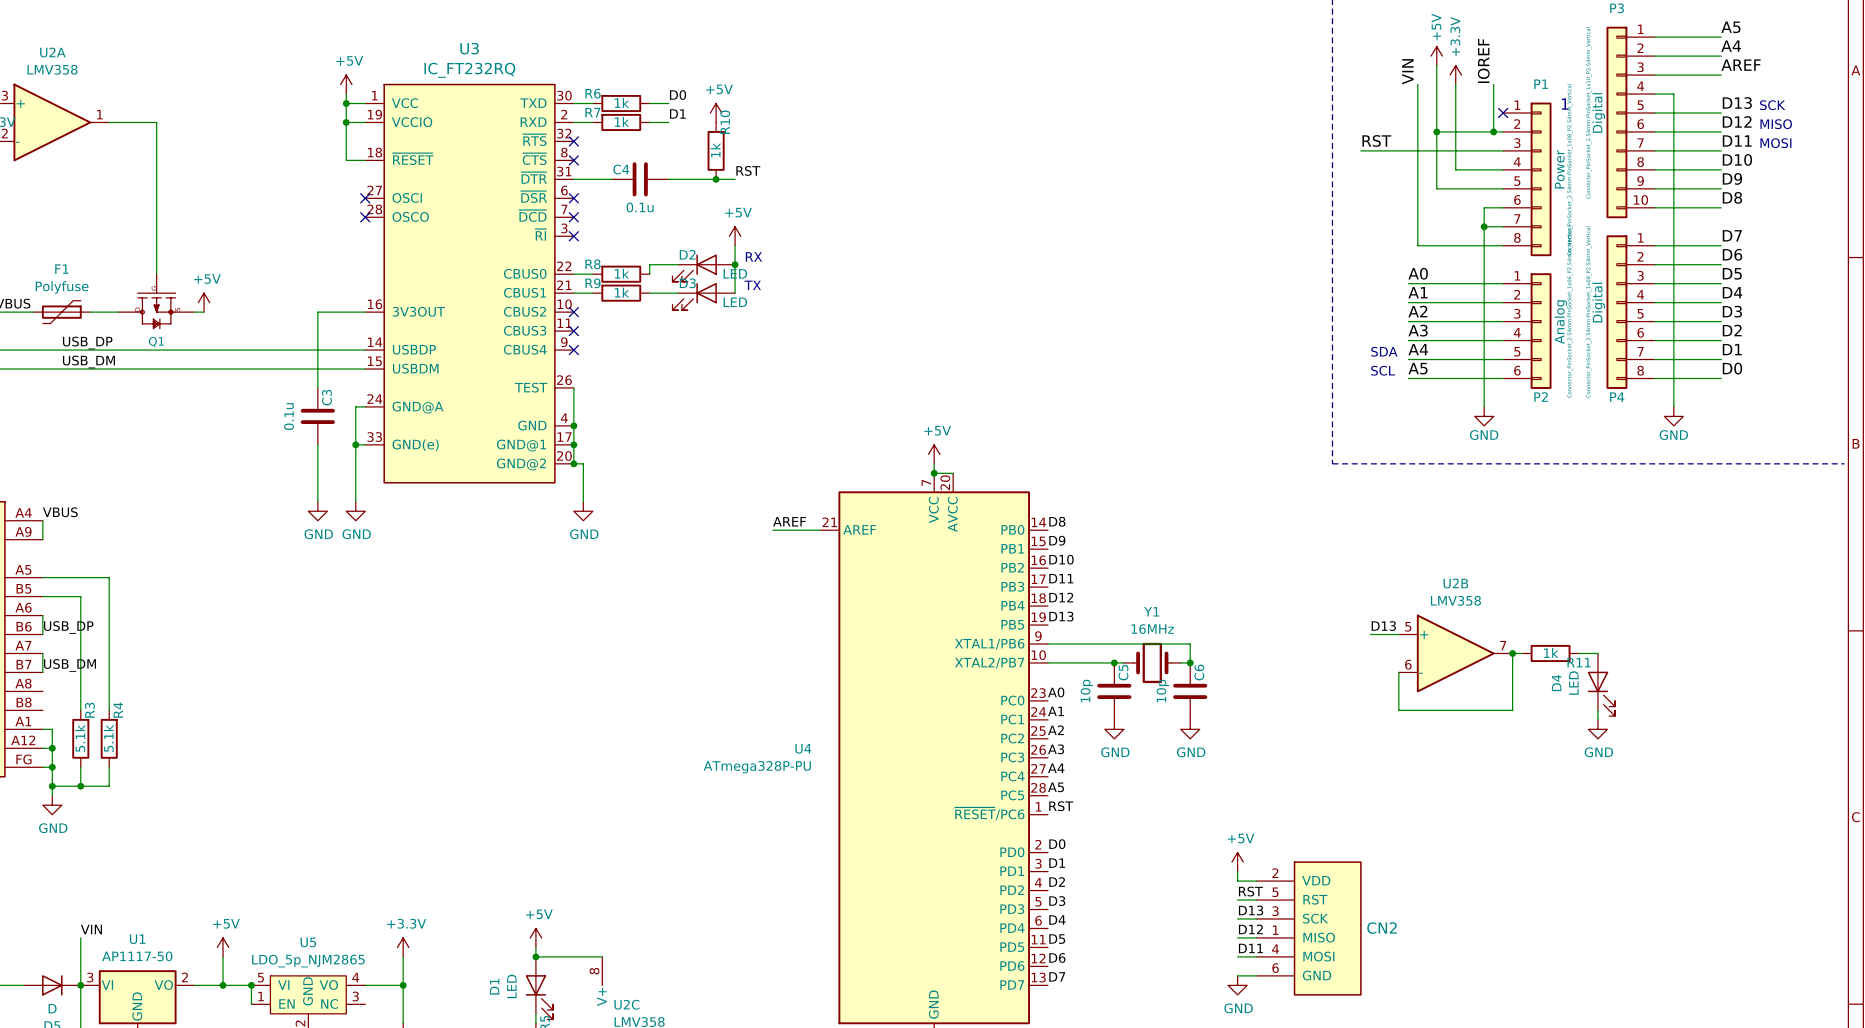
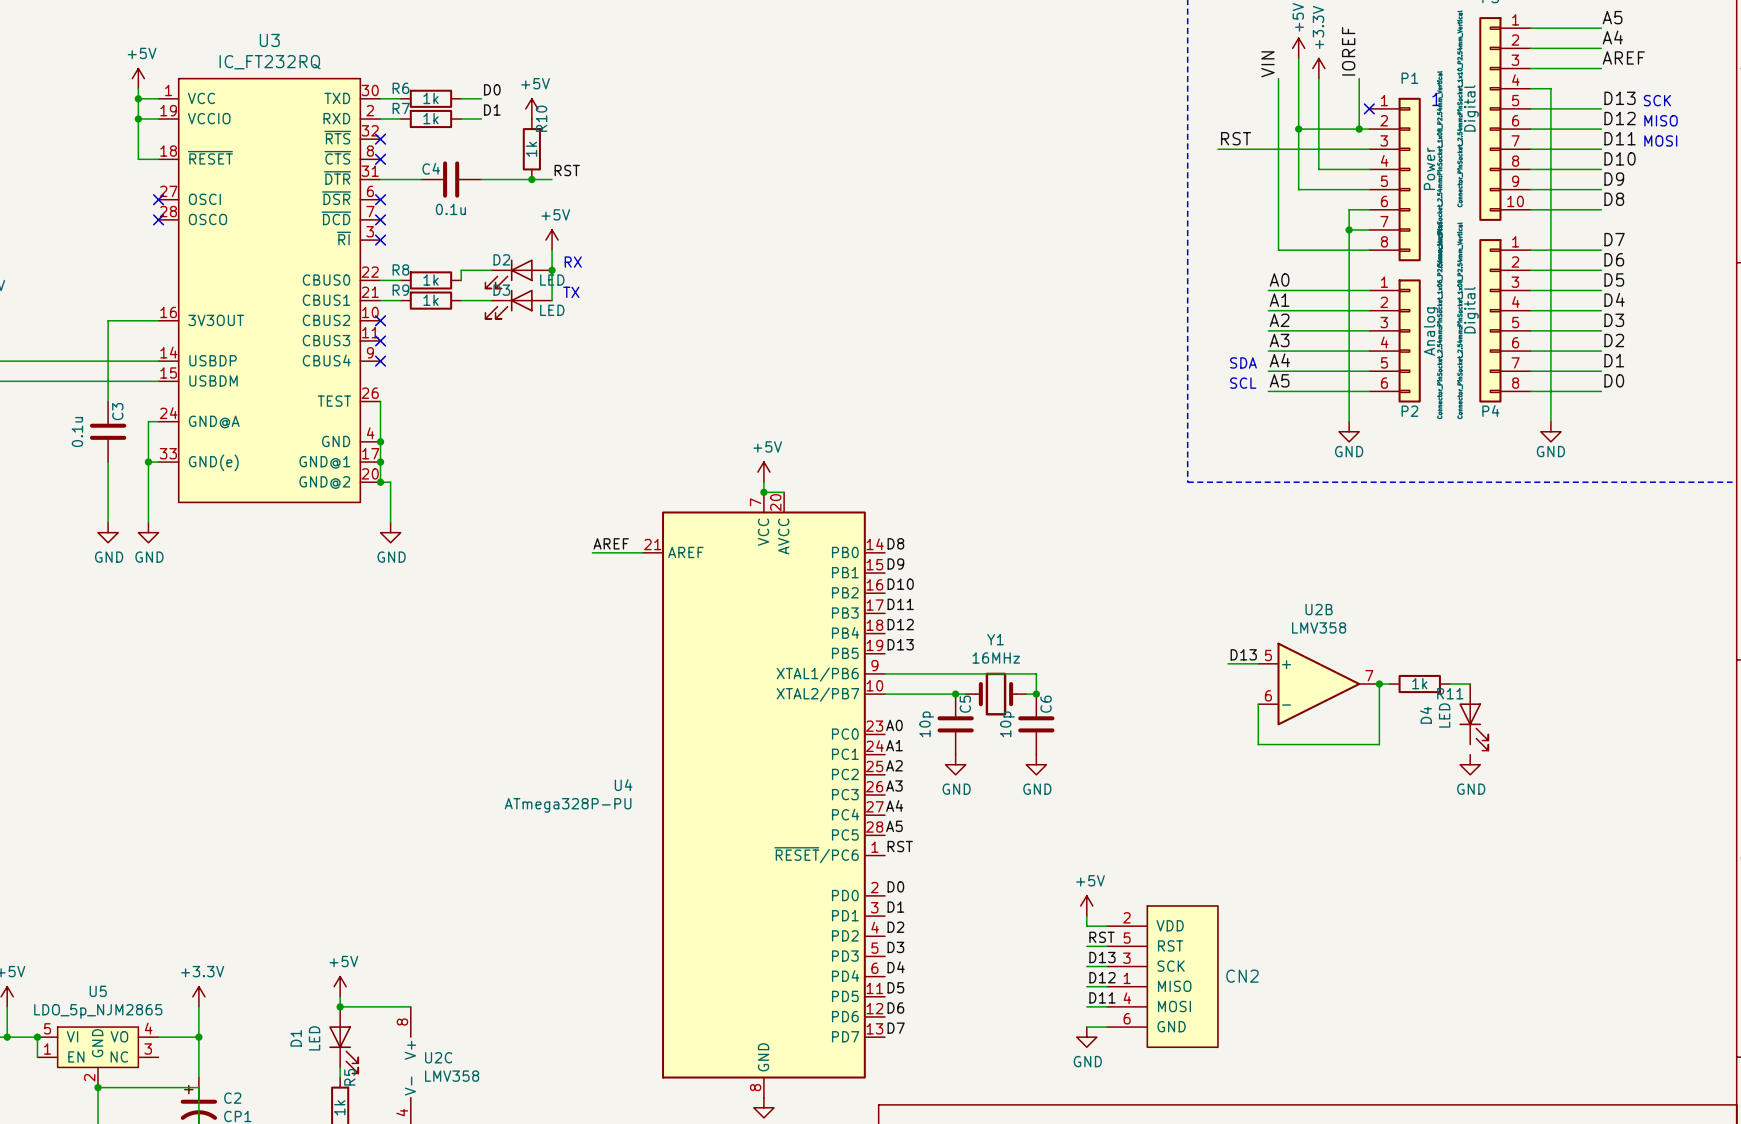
wire: (1597, 710) (1597, 719) -> none

